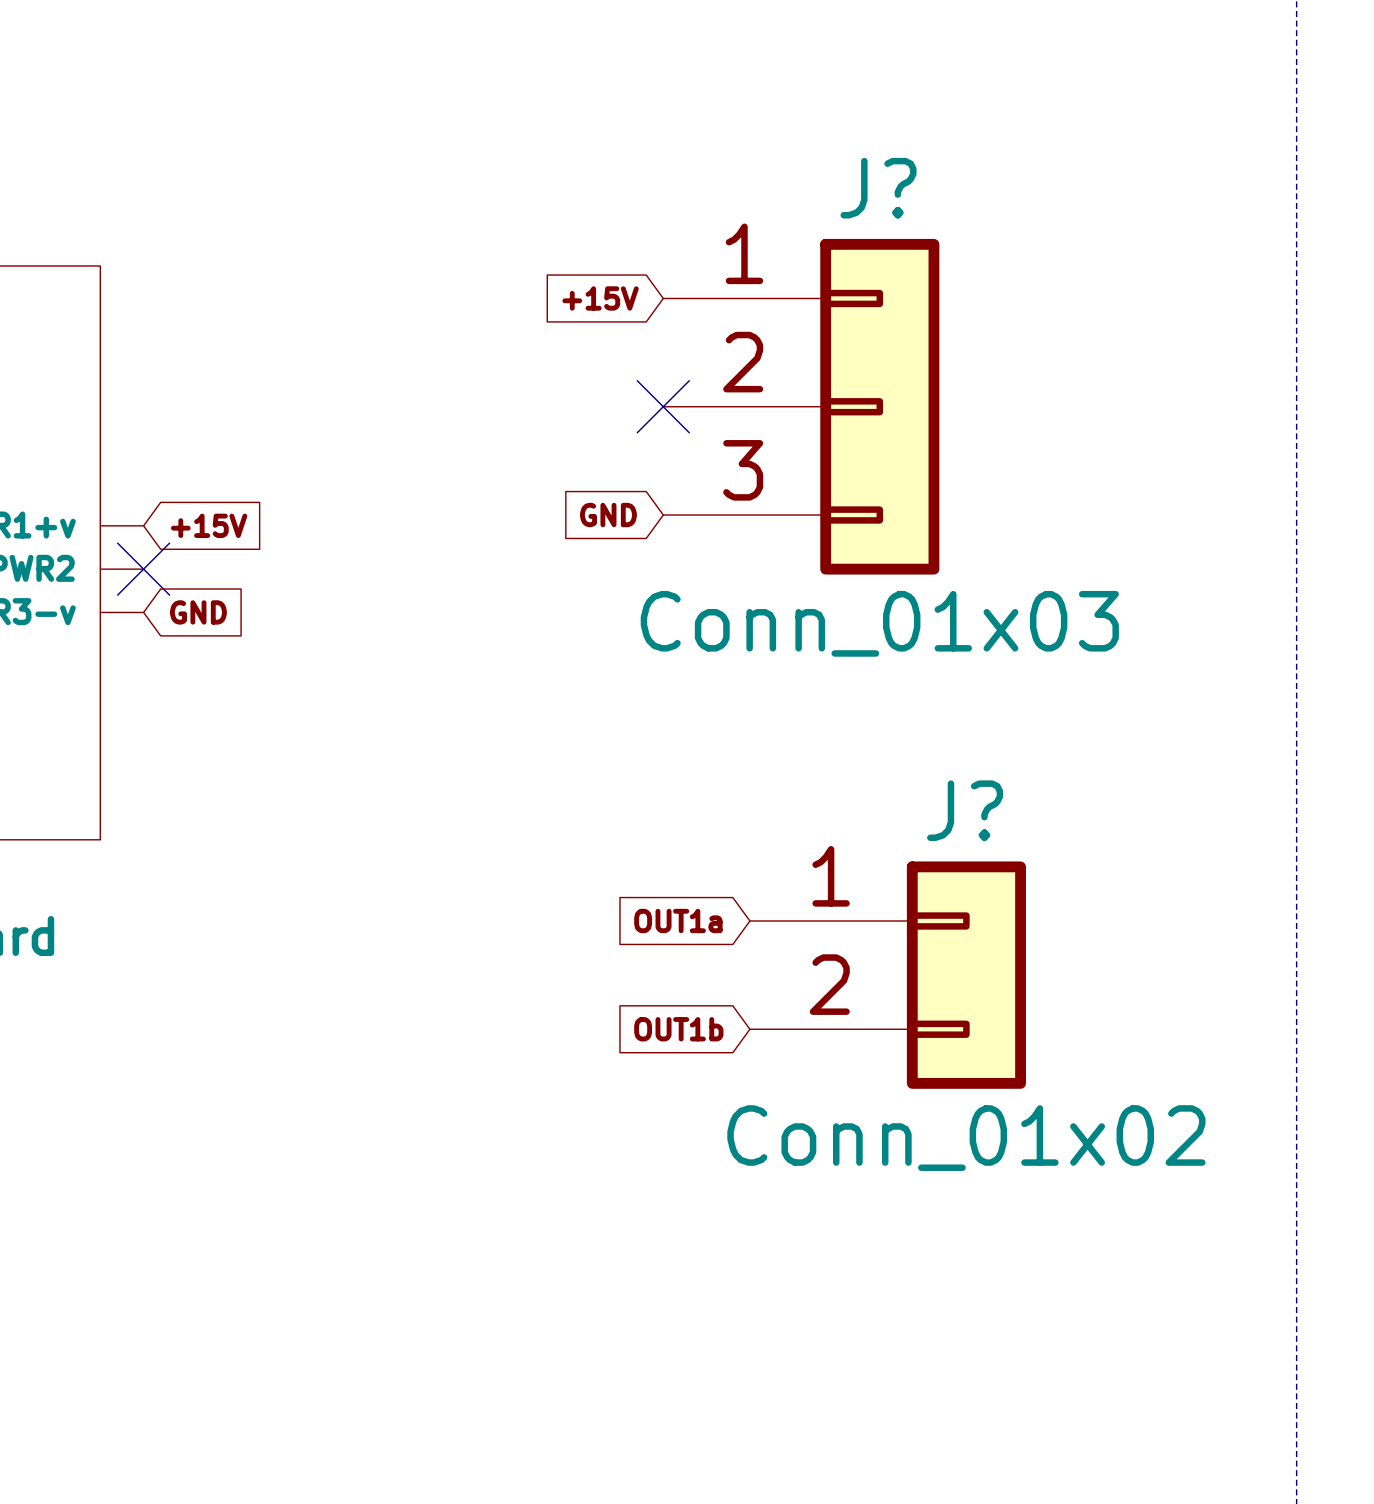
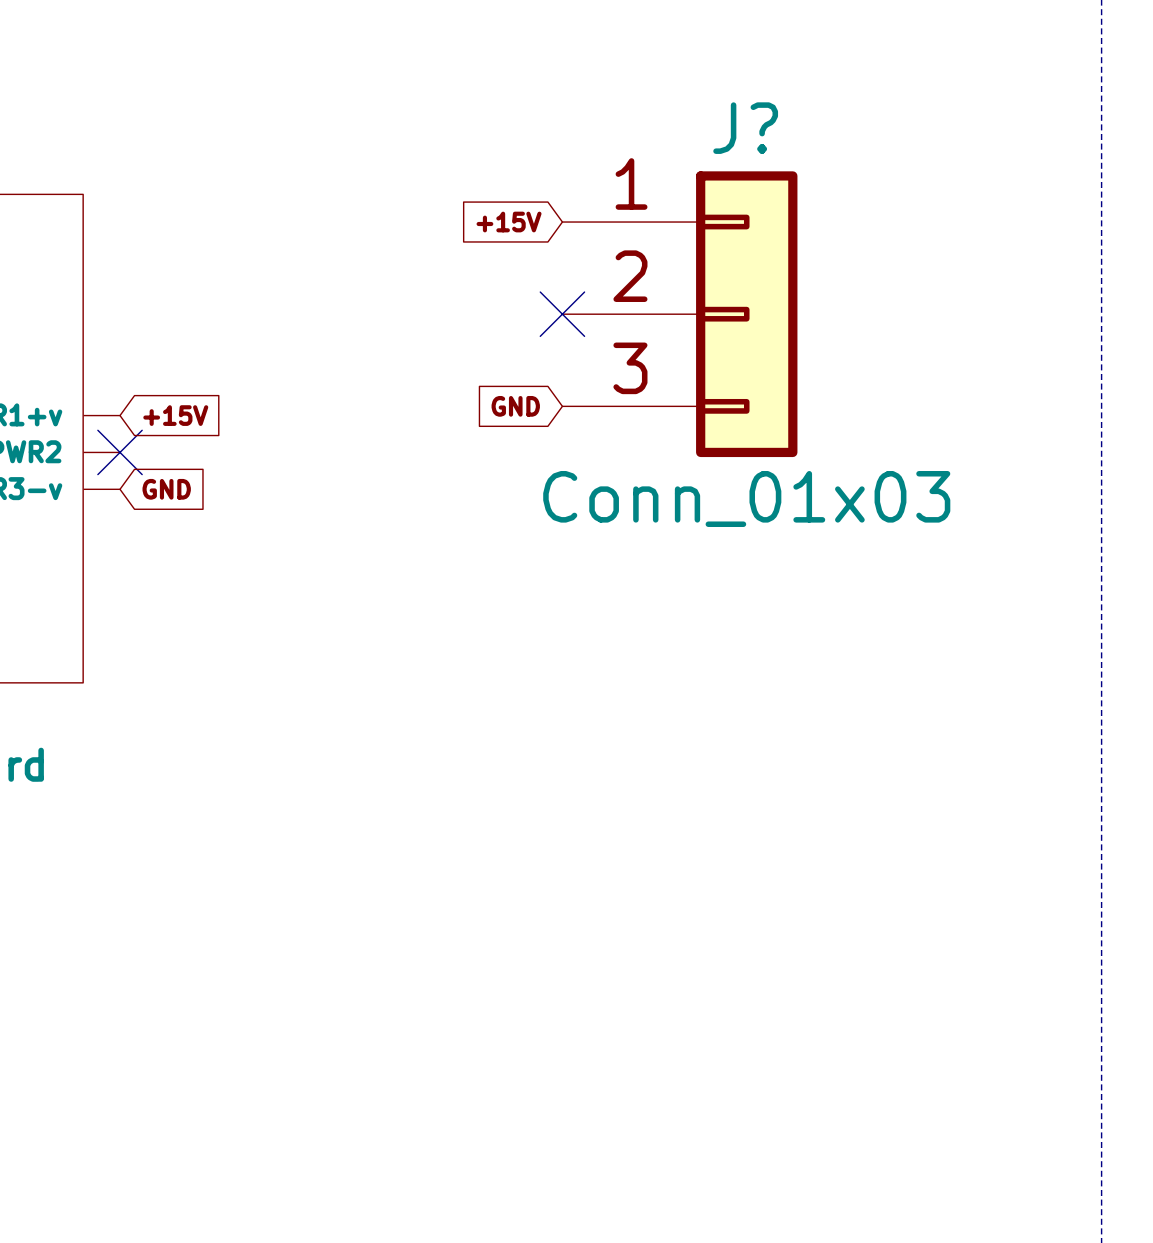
global label: OUT1a (678, 920) -> none
J?: Conn_01x02 (887, 975) -> none
global label: OUT1b (678, 1029) -> none

